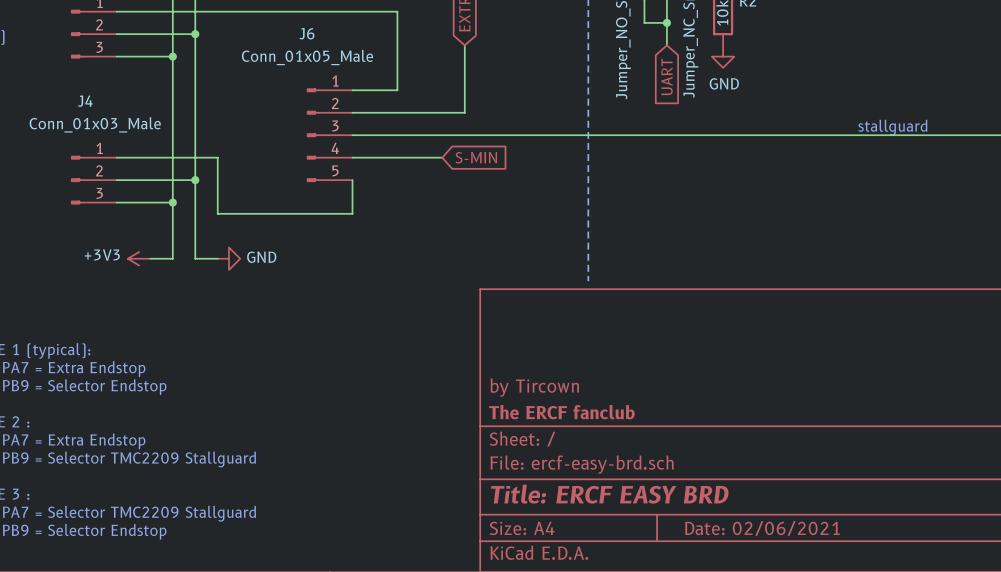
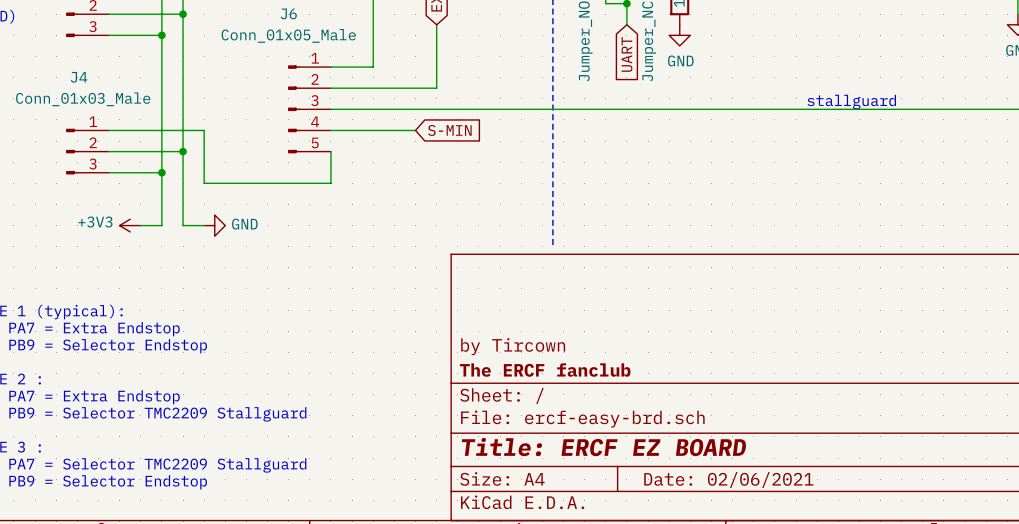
title block: Title: ERCF EASY BRD (609, 494) -> Title: ERCF EZ BOARD (604, 447)

